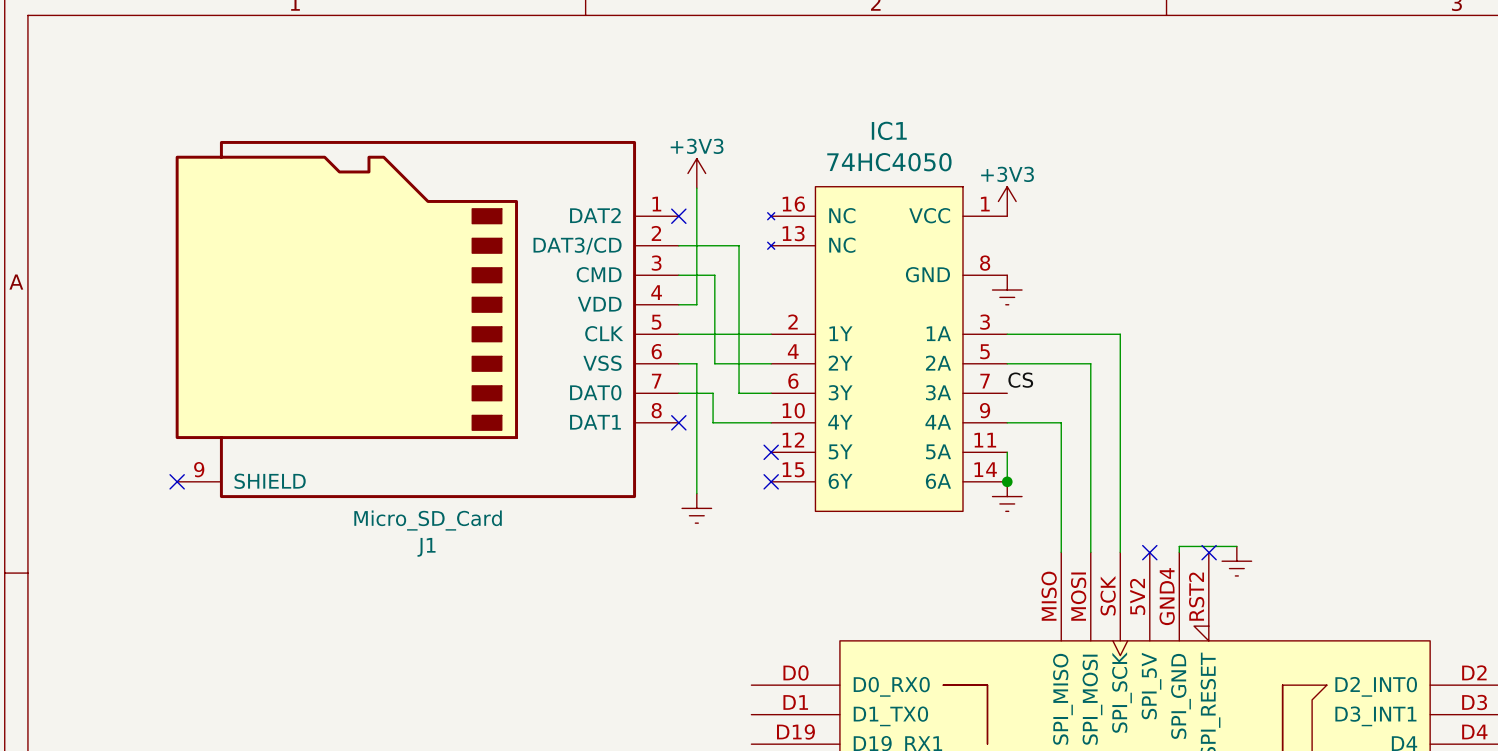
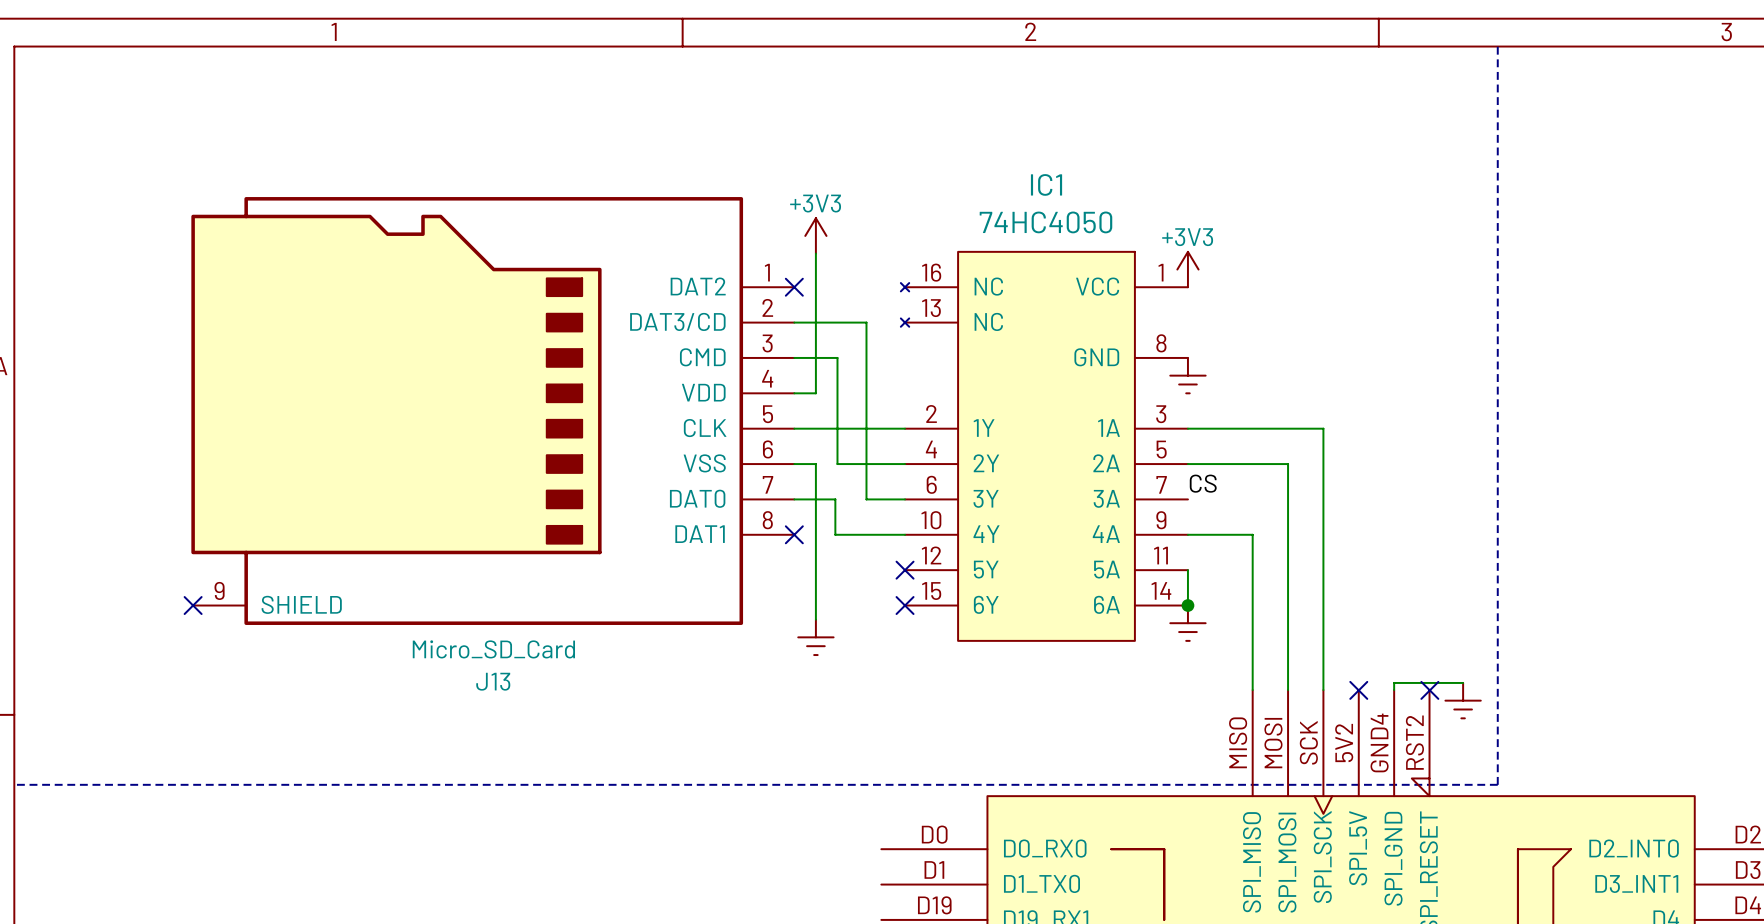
line: none -> (1497, 46) (1497, 784) (14, 784)
J1 name: J1 (426, 547) -> J13 (493, 681)

